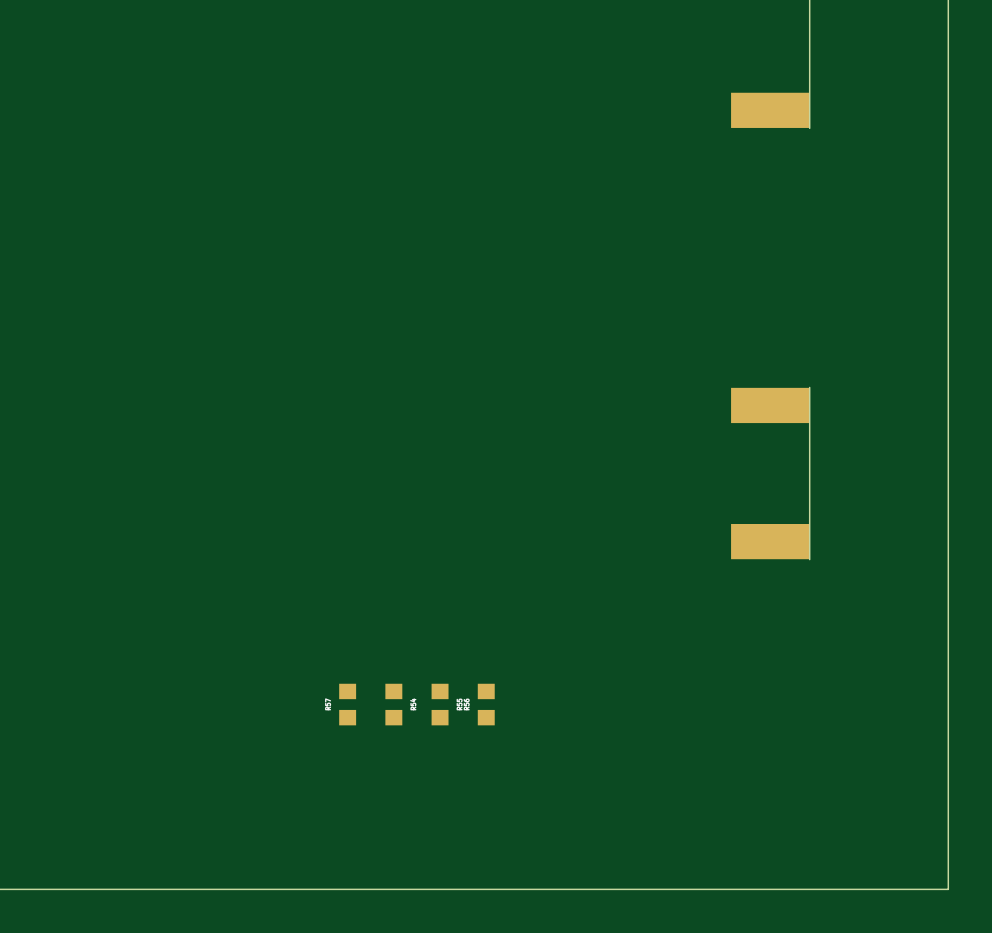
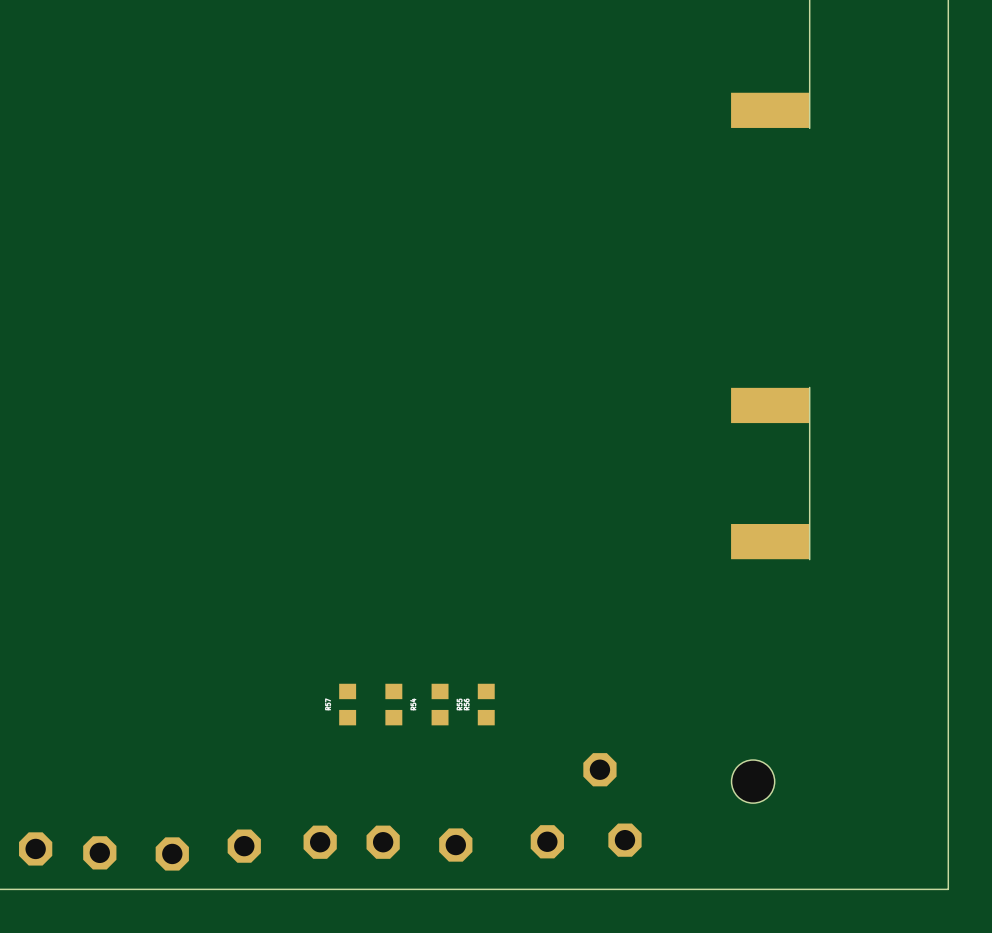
part: none -> (599, 769)
part: none -> (753, 781)
part: none -> (624, 840)
part: none -> (547, 841)
part: none -> (320, 842)
part: none -> (383, 842)
part: none -> (455, 845)
part: none -> (244, 846)
part: none -> (35, 848)
part: none -> (99, 852)
part: none -> (172, 853)

